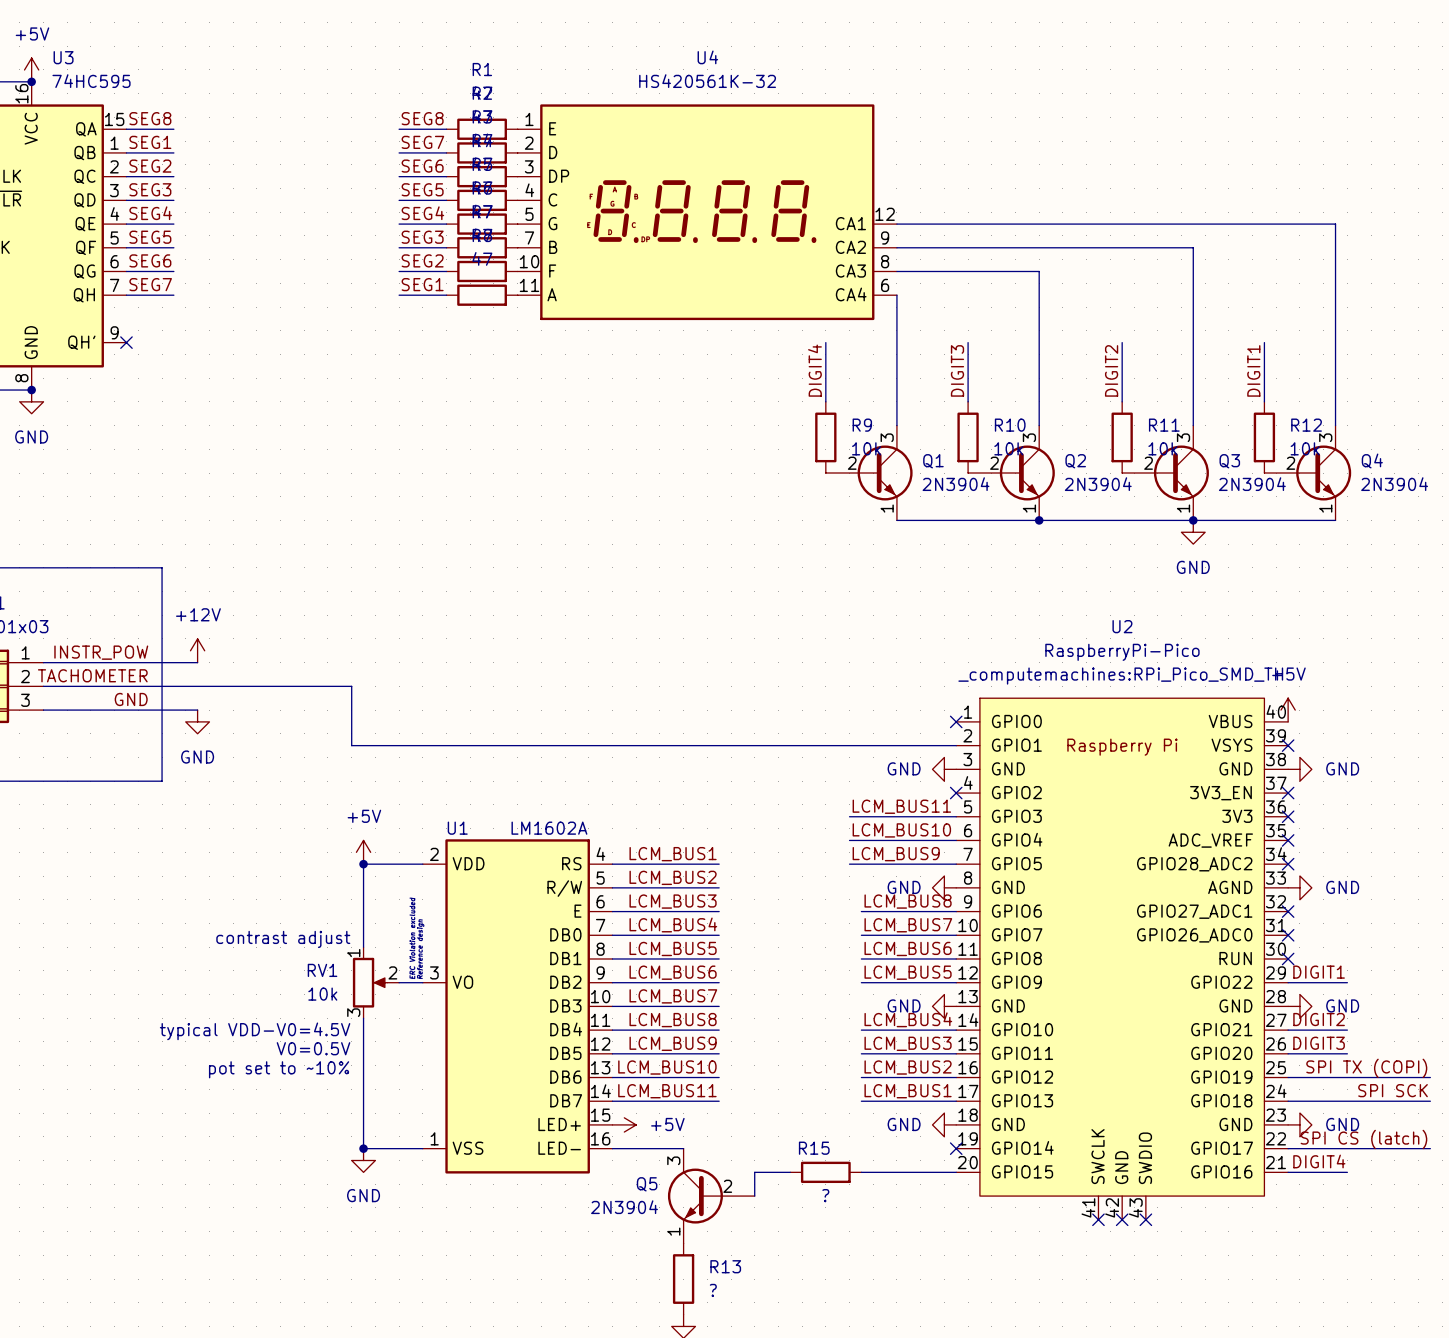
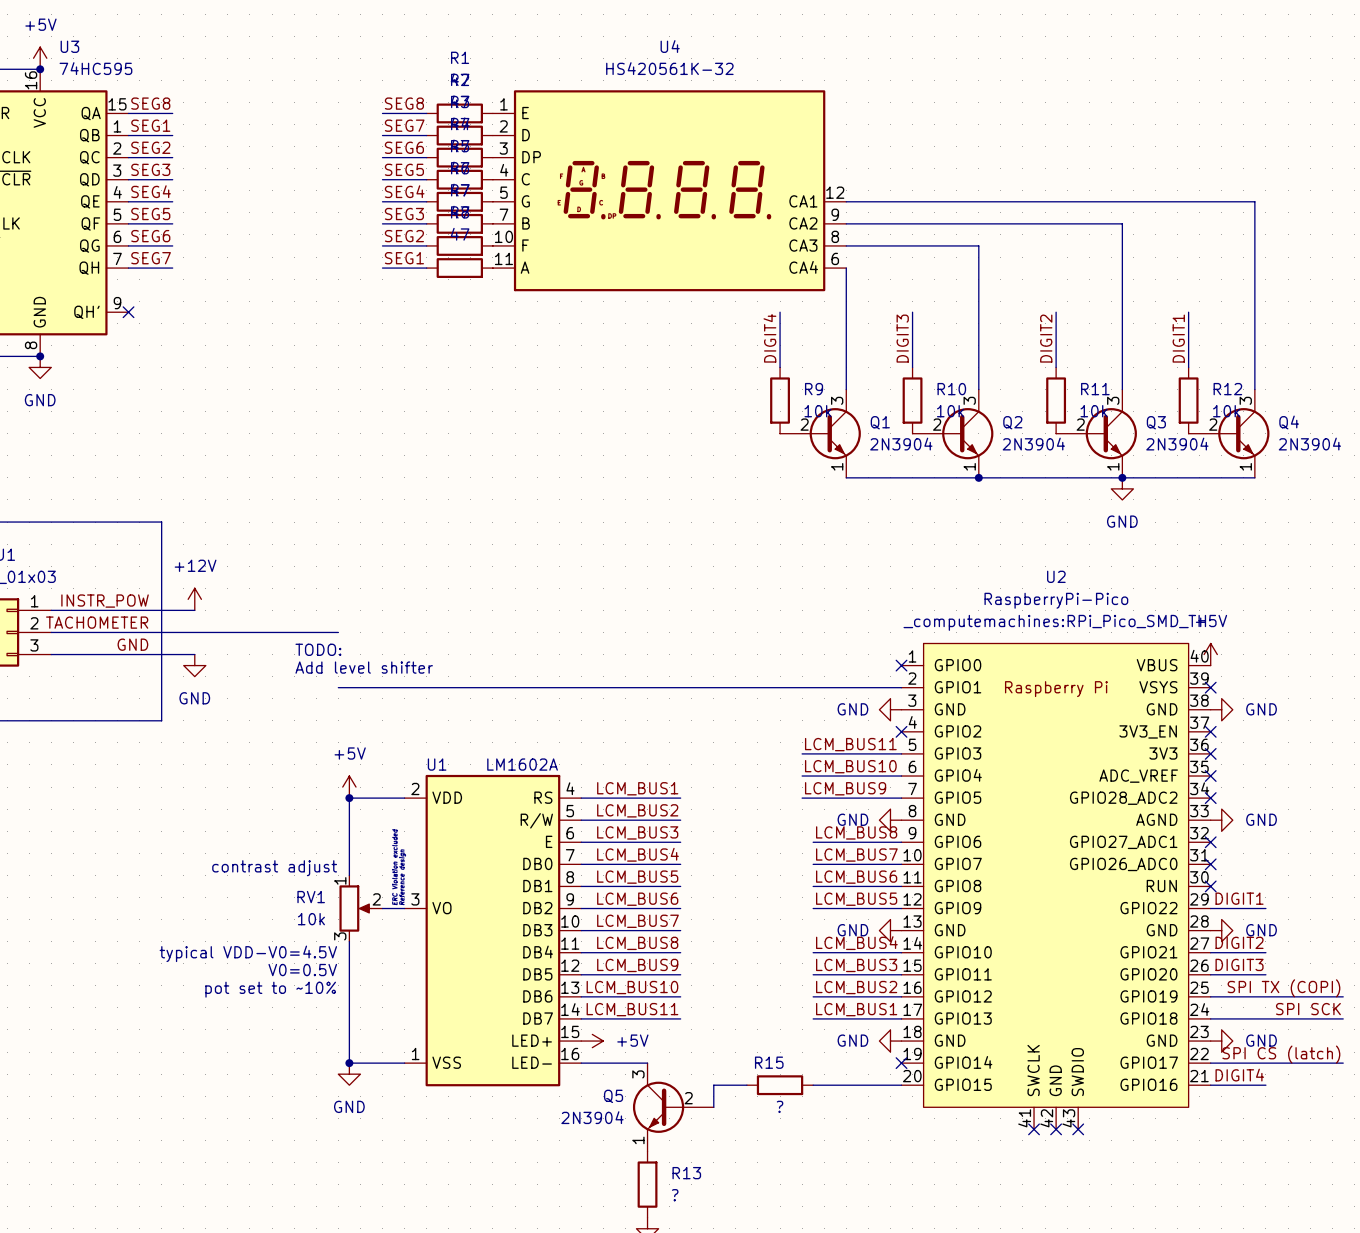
wire: (351, 686) (351, 745) -> none
text: none -> TODO: (318, 649)
text: none -> Add level shifter (364, 667)

